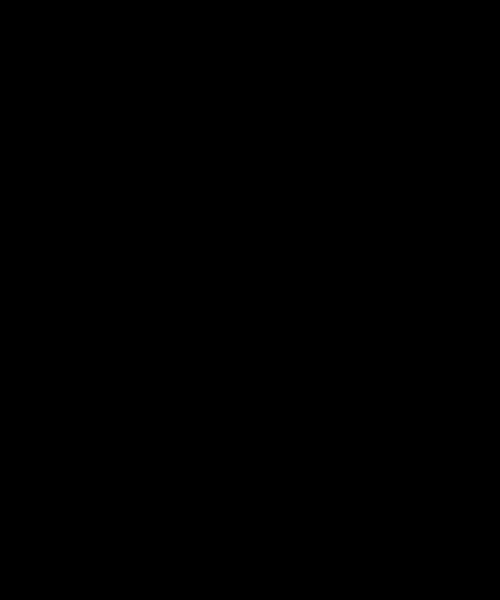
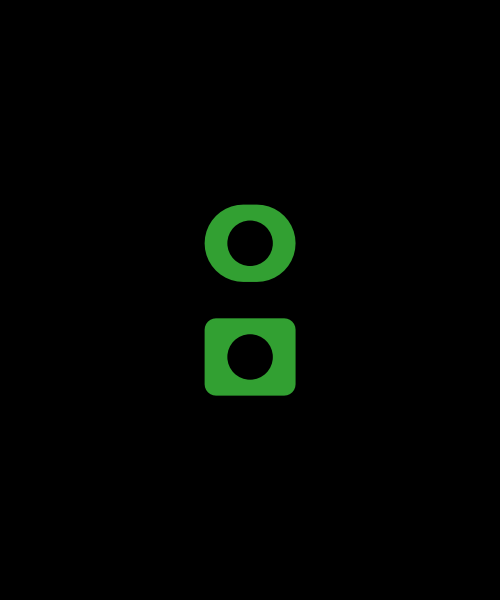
part: none -> (250, 300)

